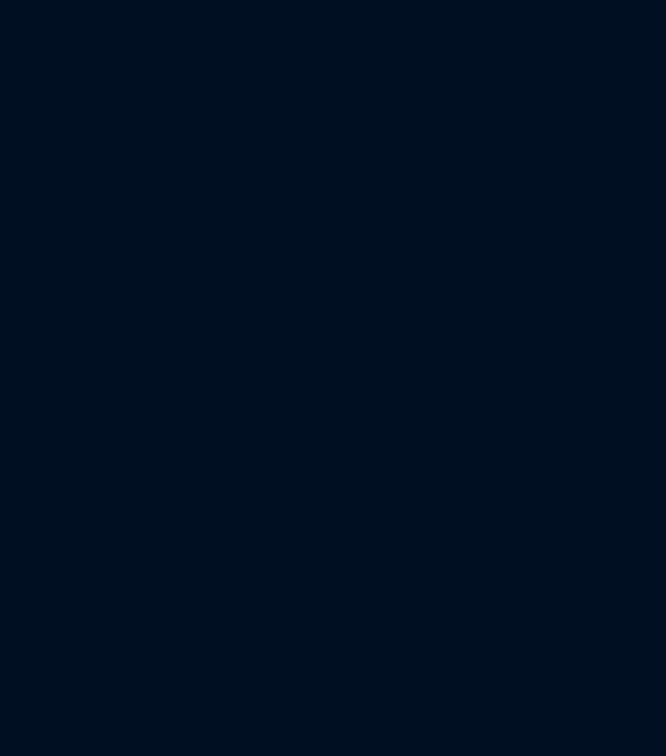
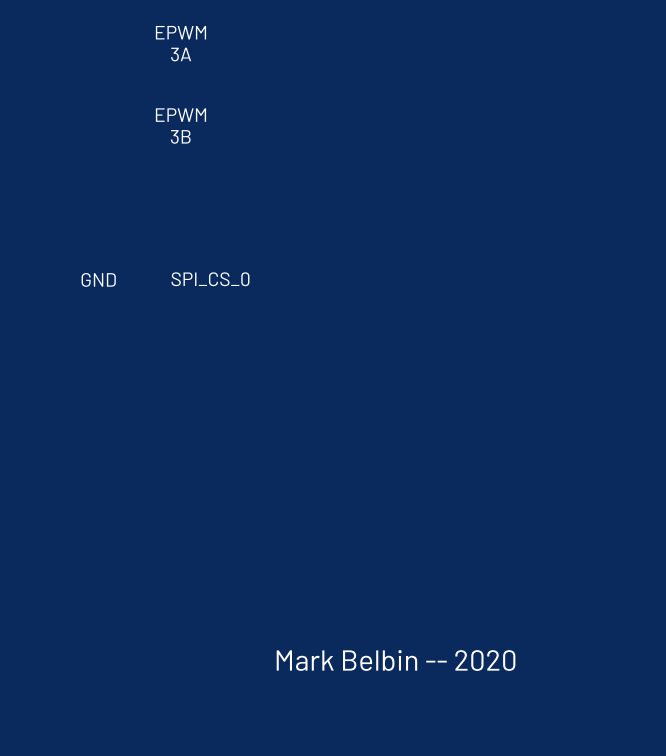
text: none -> EPWM (180, 32)
text: none -> 3A (181, 54)
text: none -> EPWM (180, 115)
text: none -> 3B (180, 136)
text: none -> GND (98, 279)
text: none -> SPI_CS_0 (210, 279)
text: none -> Mark Belbin -- 2020 (396, 660)

